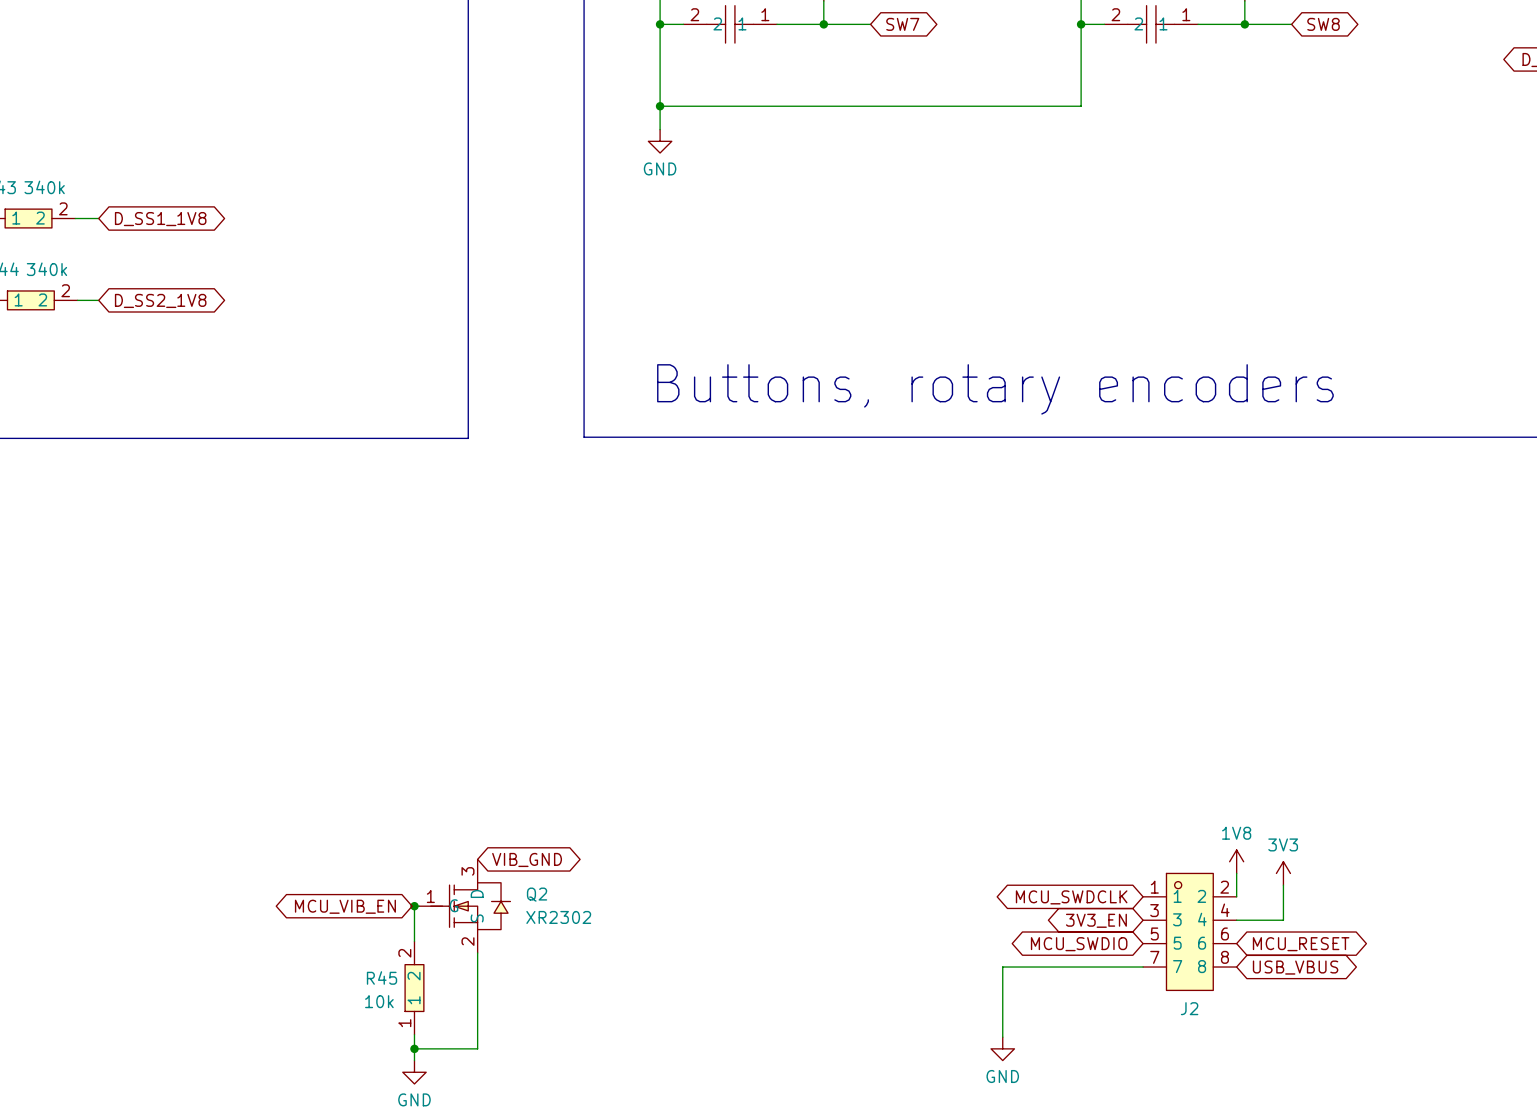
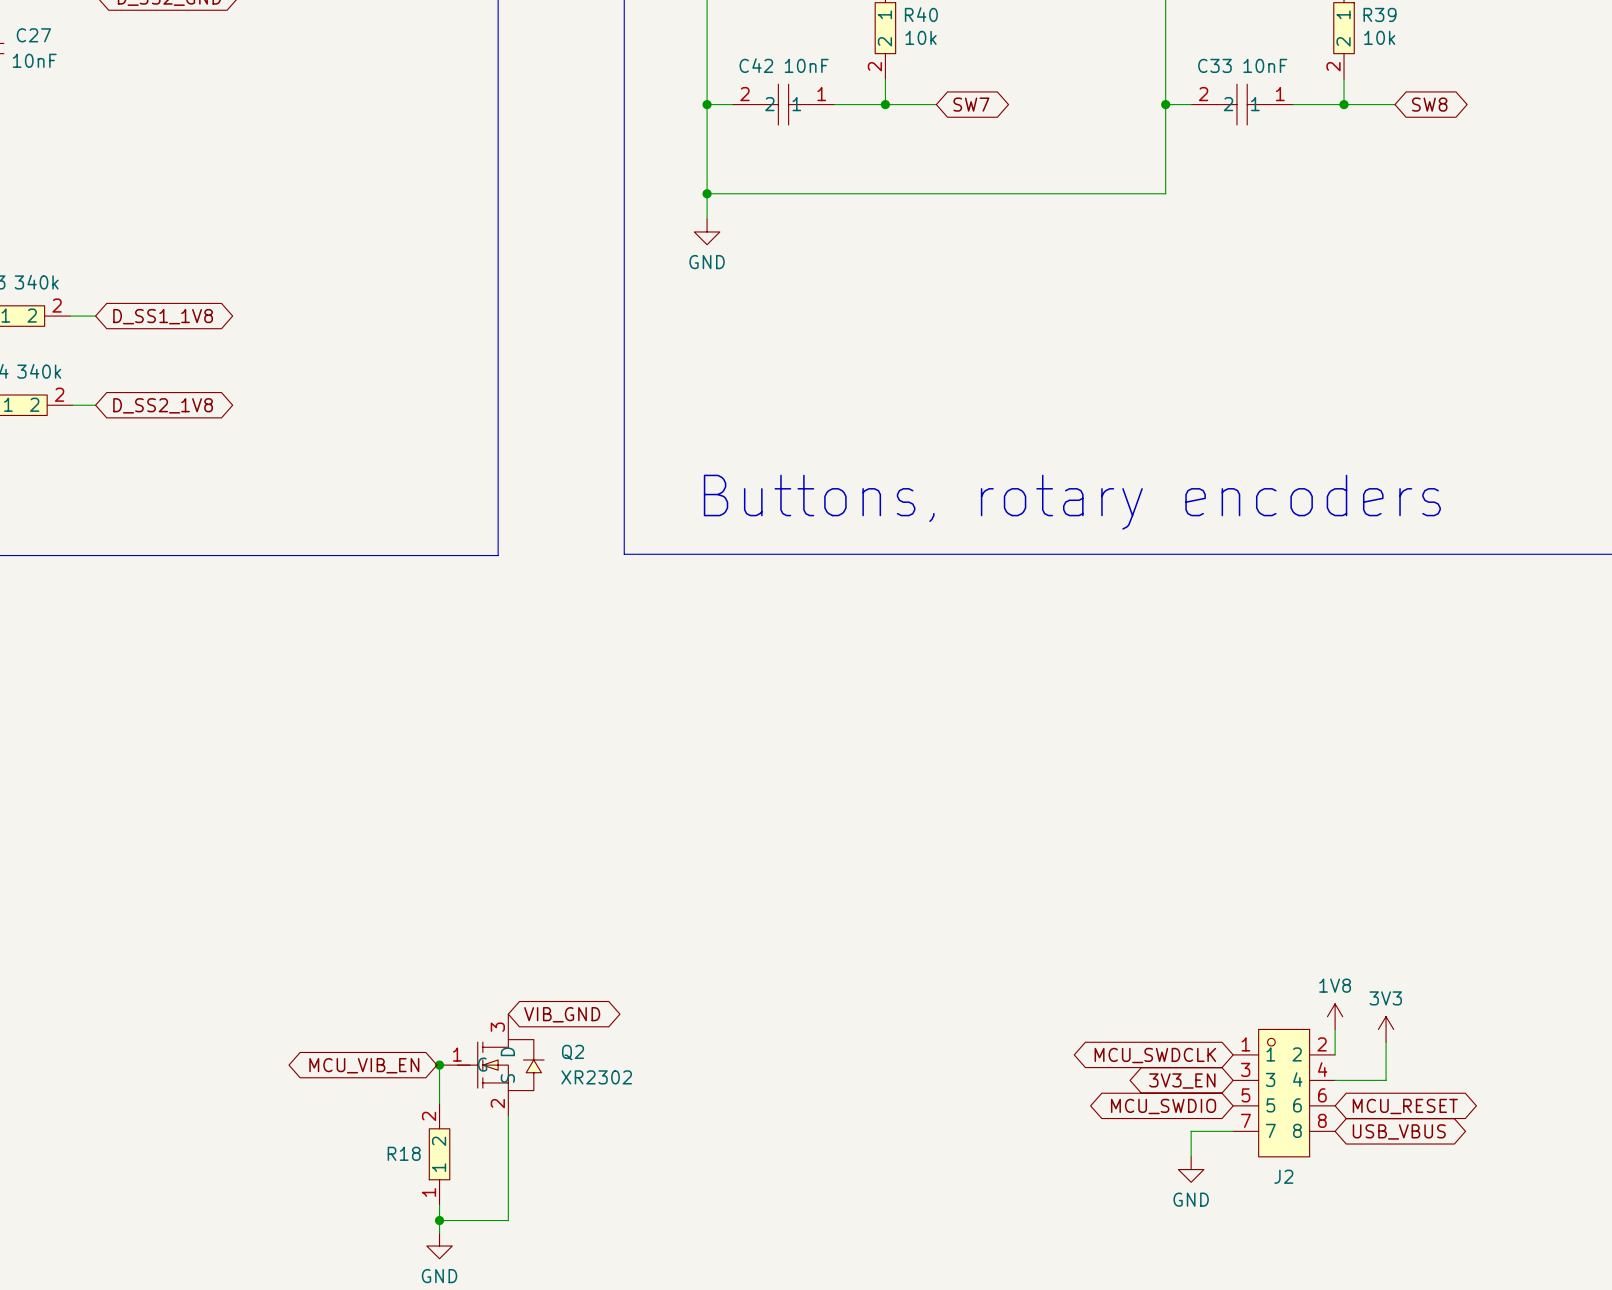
wire: (1104, 967) (1002, 967) (1002, 1037) -> (1191, 1131) (1191, 1156)
R45 name: R45 (382, 977) -> R18 (404, 1153)
R45 text: 10k (379, 1001) -> none
power symbol position: GND (1002, 1048) -> GND (1191, 1169)

